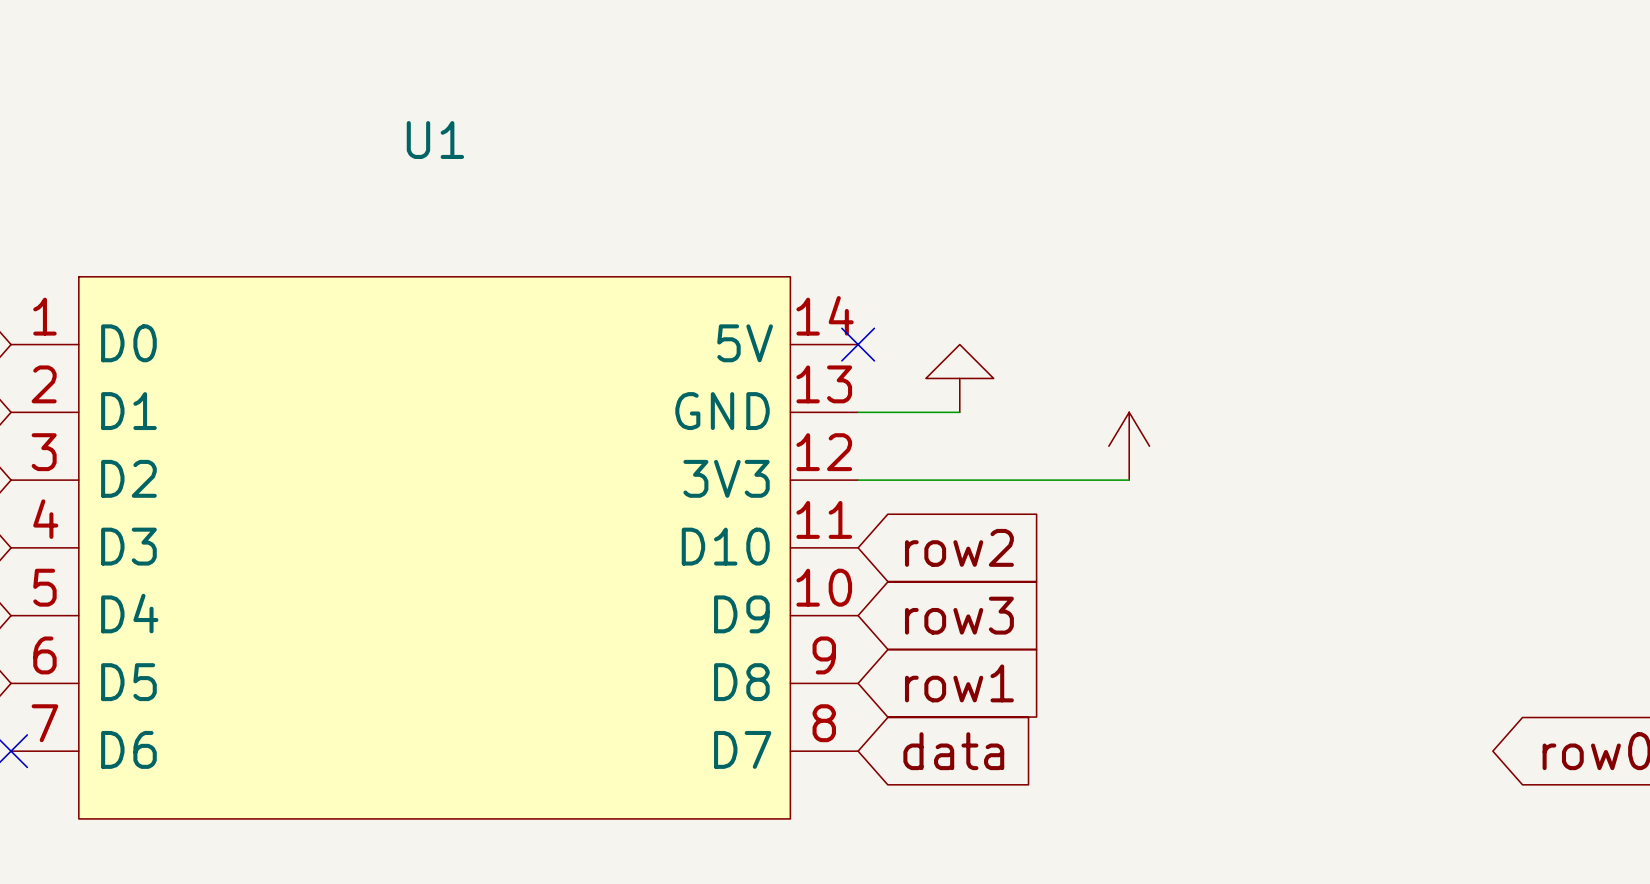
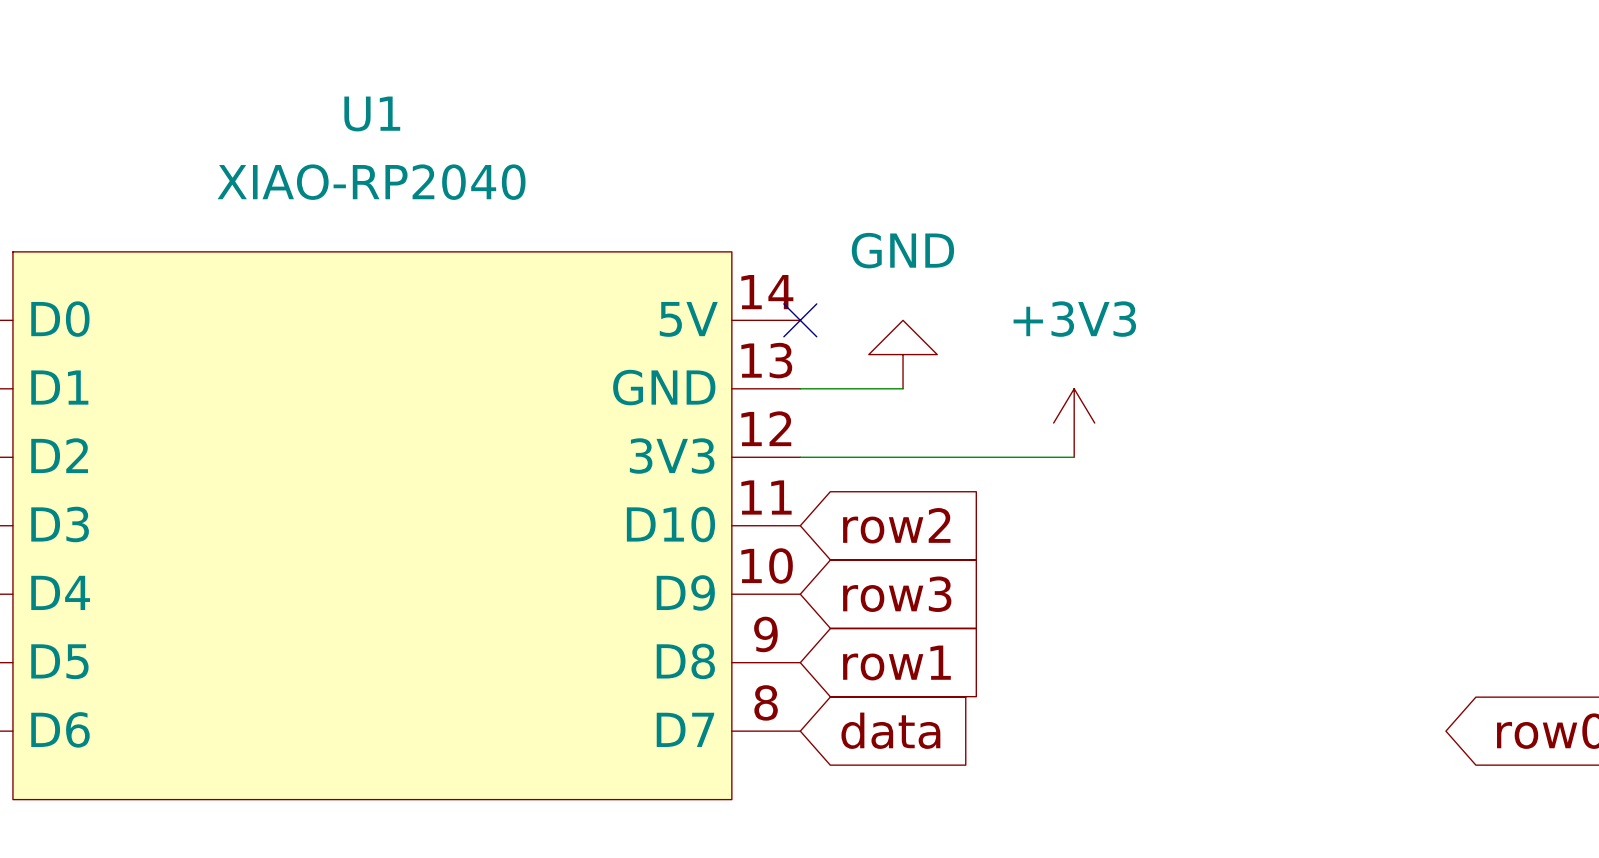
U1 value: none -> XIAO-RP2040 (371, 182)
power symbol text: none -> GND (902, 250)
power symbol text: none -> +3V3 (1074, 319)

